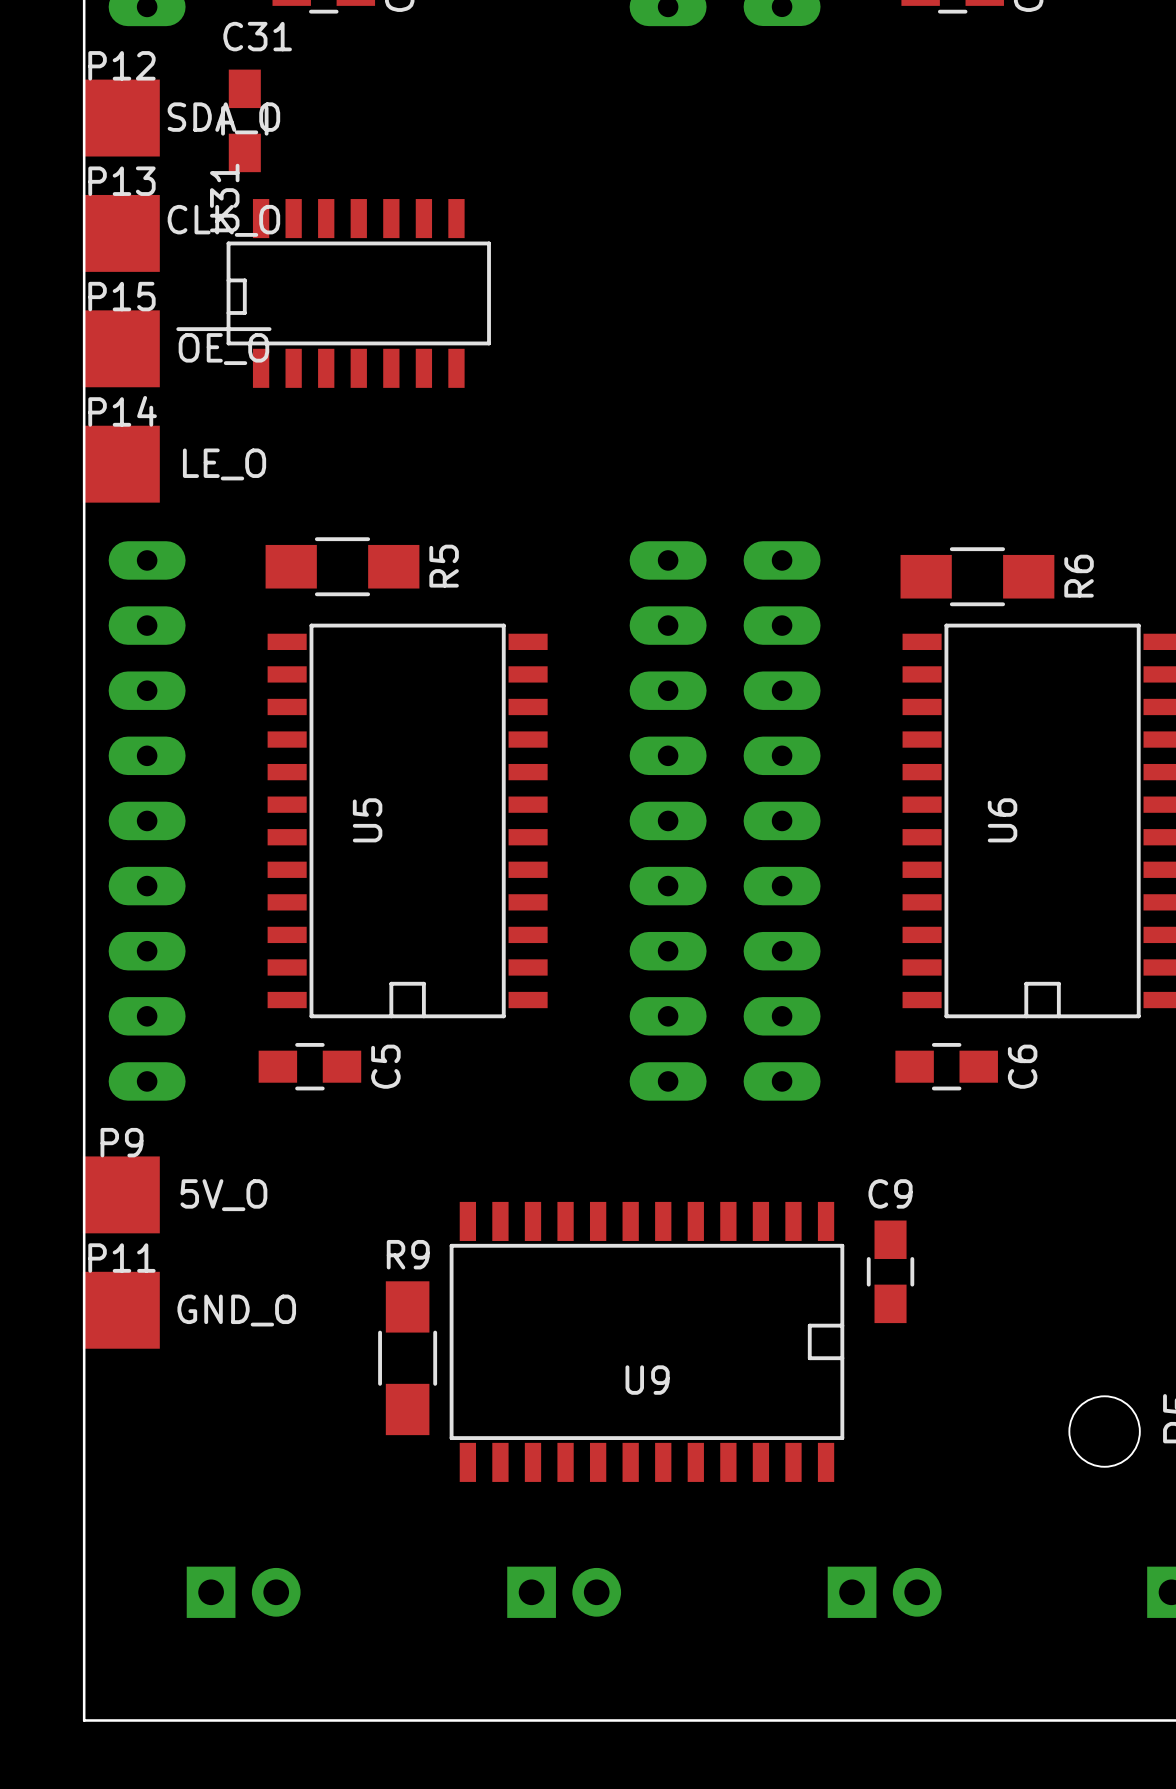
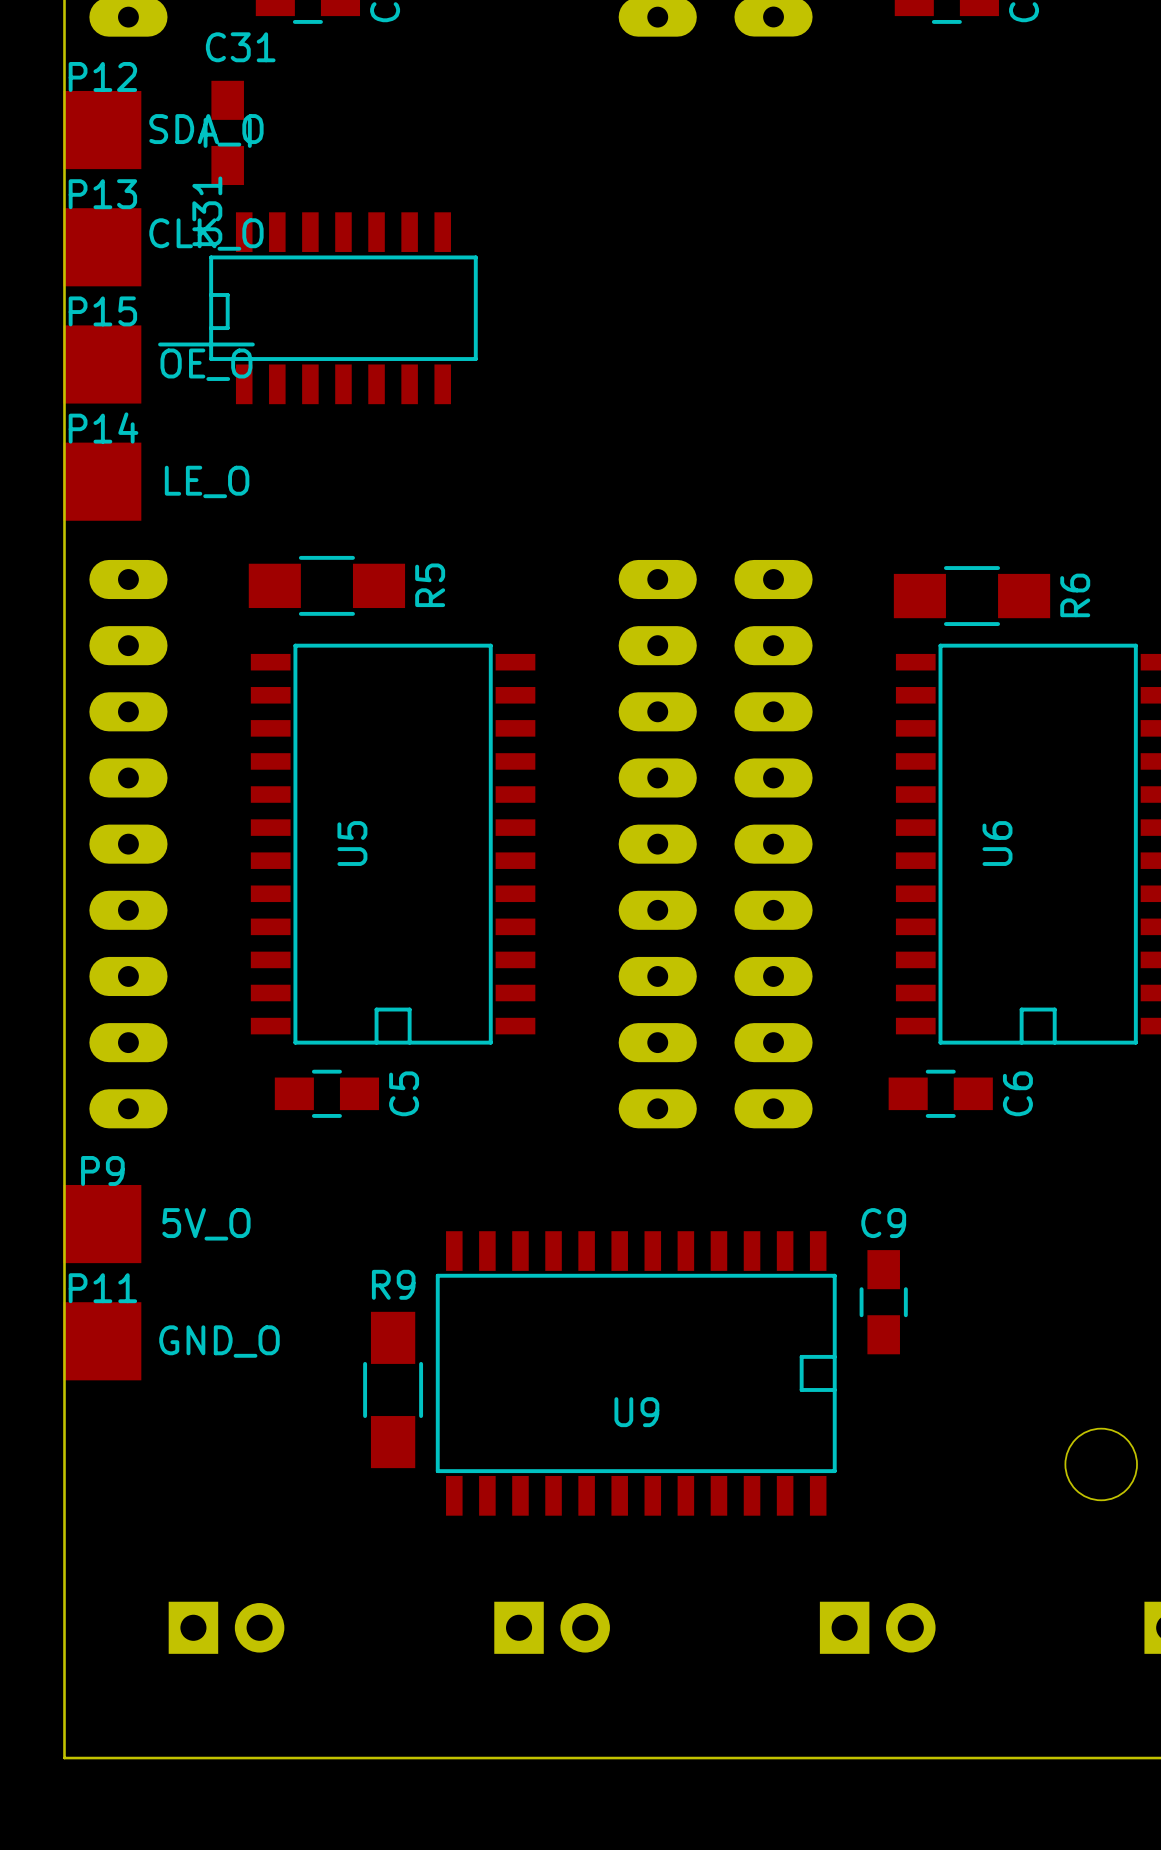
C5 position: (309, 1066) -> (326, 1093)

